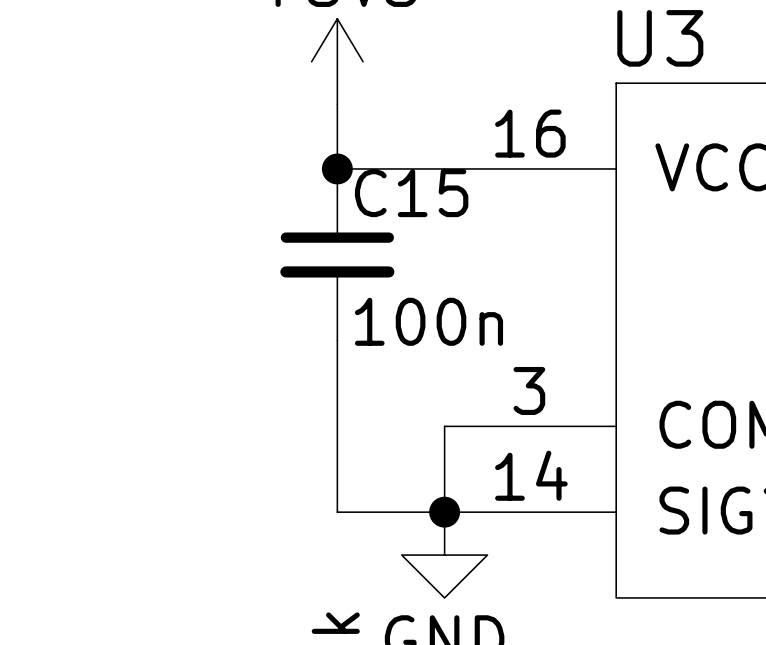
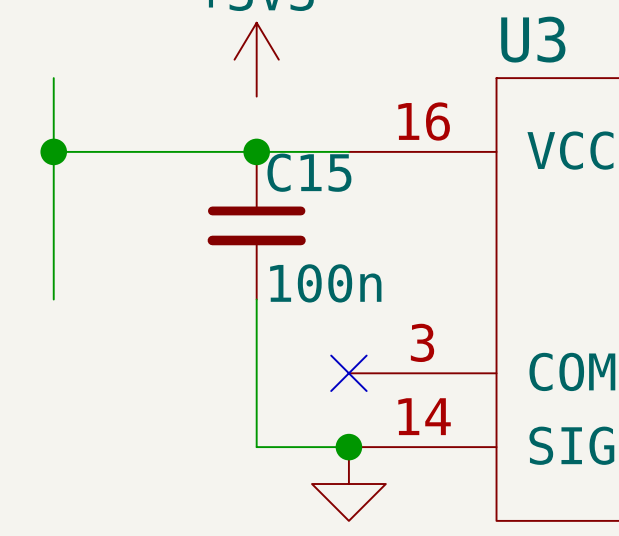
wire: none -> (53, 78) (53, 299)
wire: (337, 104) (337, 168) -> (53, 151) (256, 151)
junction: none -> (53, 151)
wire: (444, 426) (444, 512) -> none
no-connect mark: none -> (348, 373)

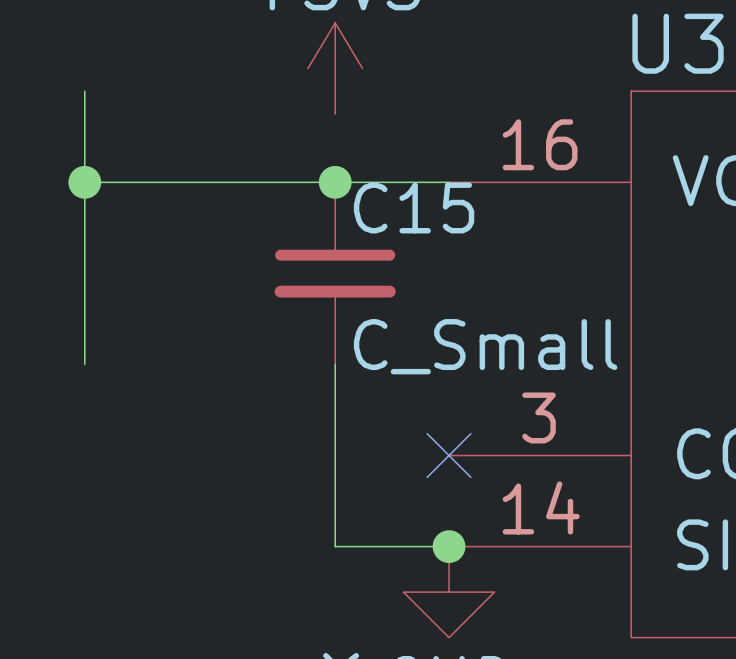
C15 value: 100n (325, 283) -> C_Small (485, 346)

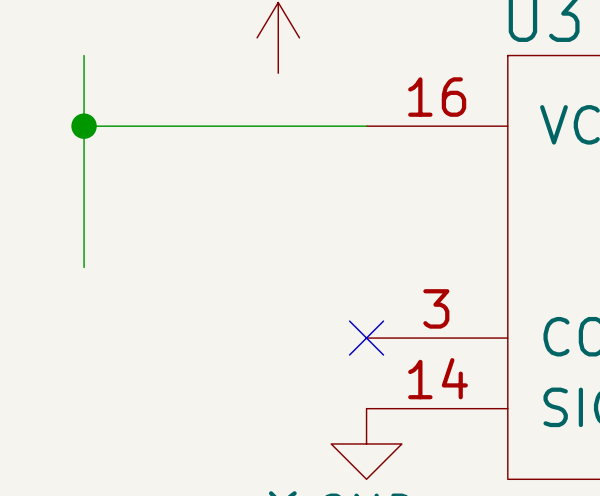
junction: (335, 182) -> none
C15: C_Small (335, 273) -> none
wire: (335, 364) (335, 546) (449, 546) -> none
junction: (449, 546) -> none

